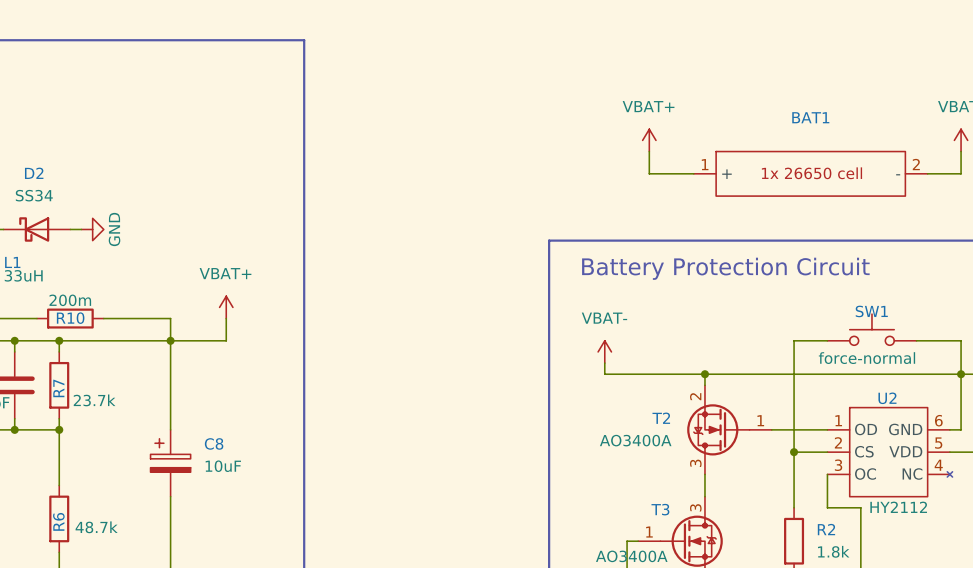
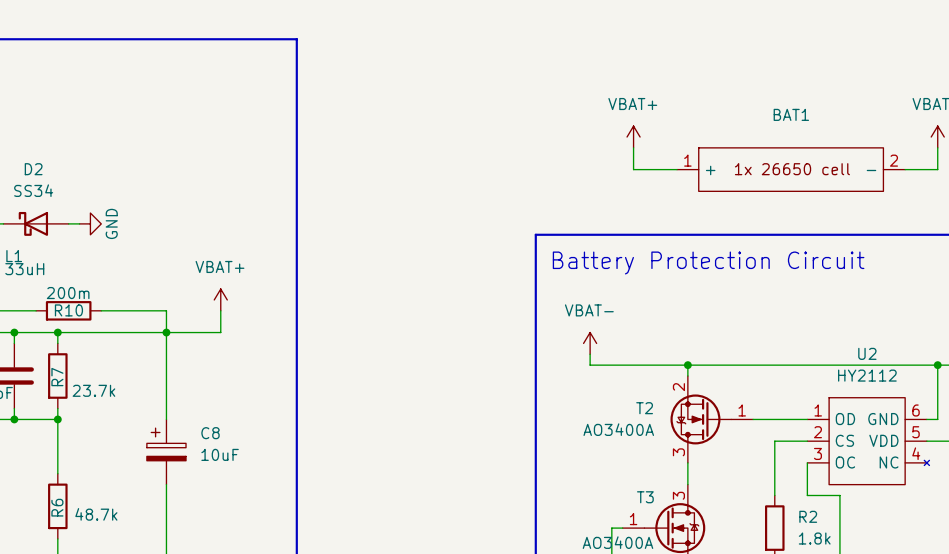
SW1: force-normal (871, 329) -> none
wire: (827, 340) (794, 340) (794, 452) -> none
wire: (916, 340) (961, 340) (961, 374) -> none
U2 name position: U2 (887, 398) -> U2 (867, 353)
junction: (794, 452) -> none
U2 value position: HY2112 (898, 507) -> HY2112 (867, 375)

